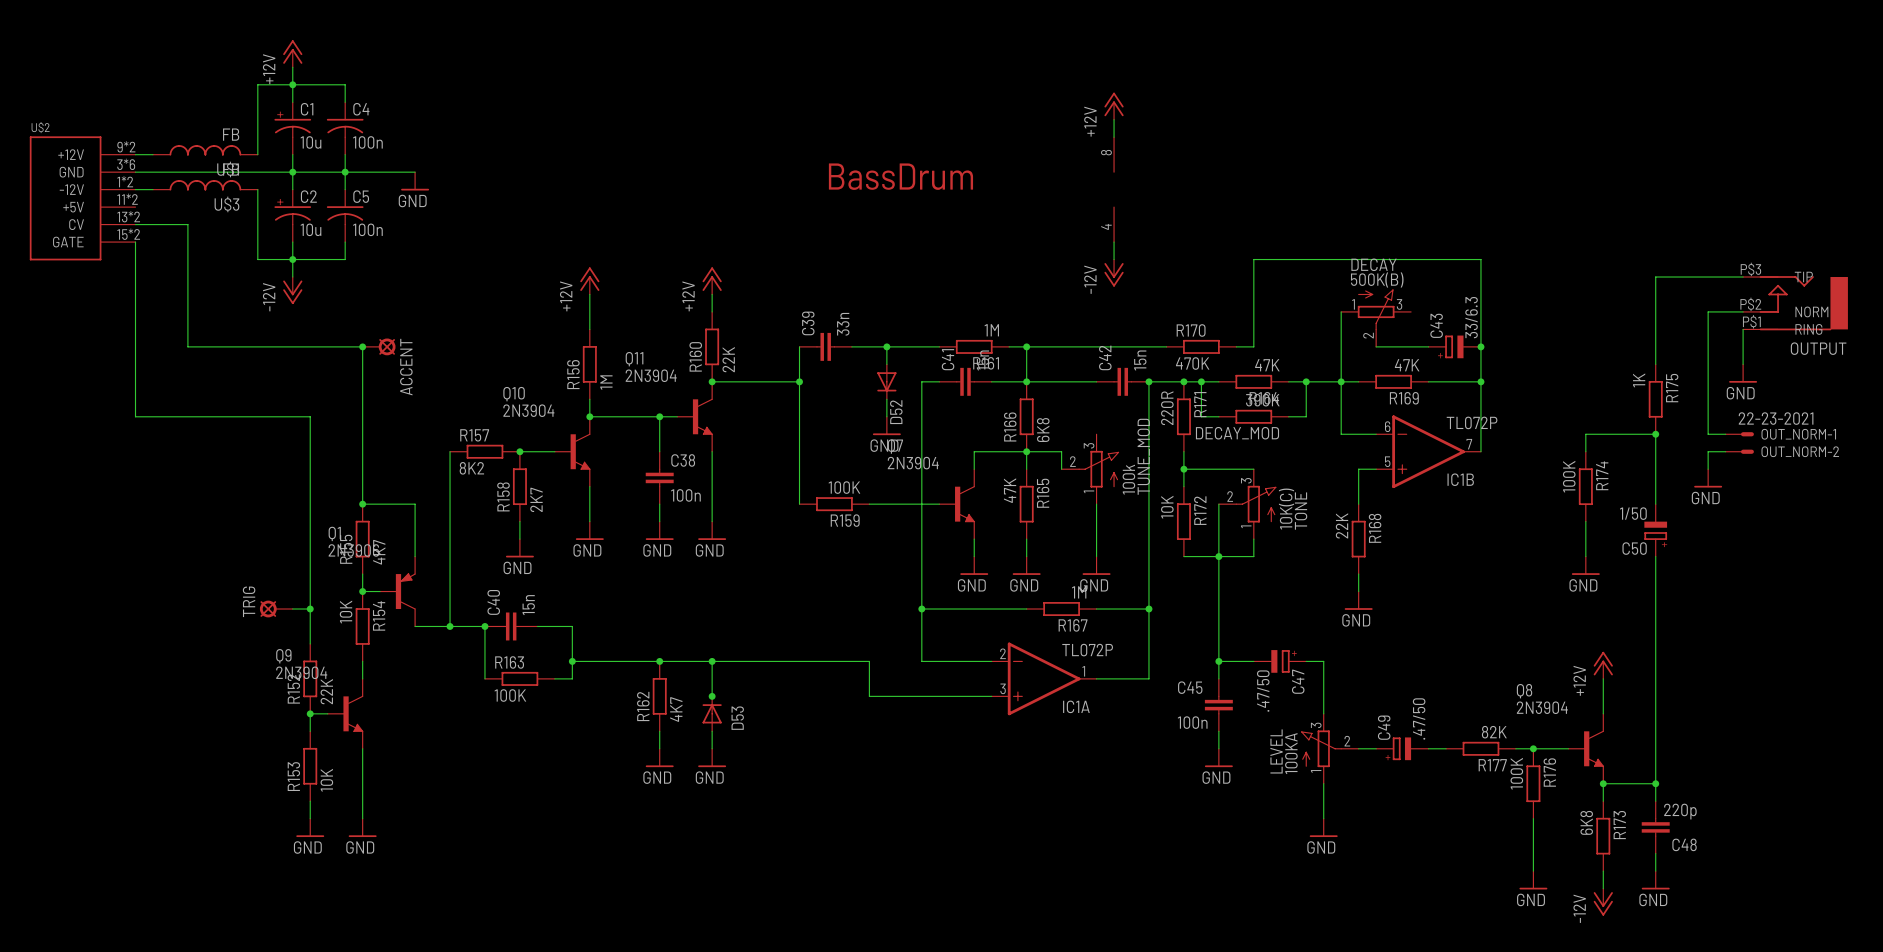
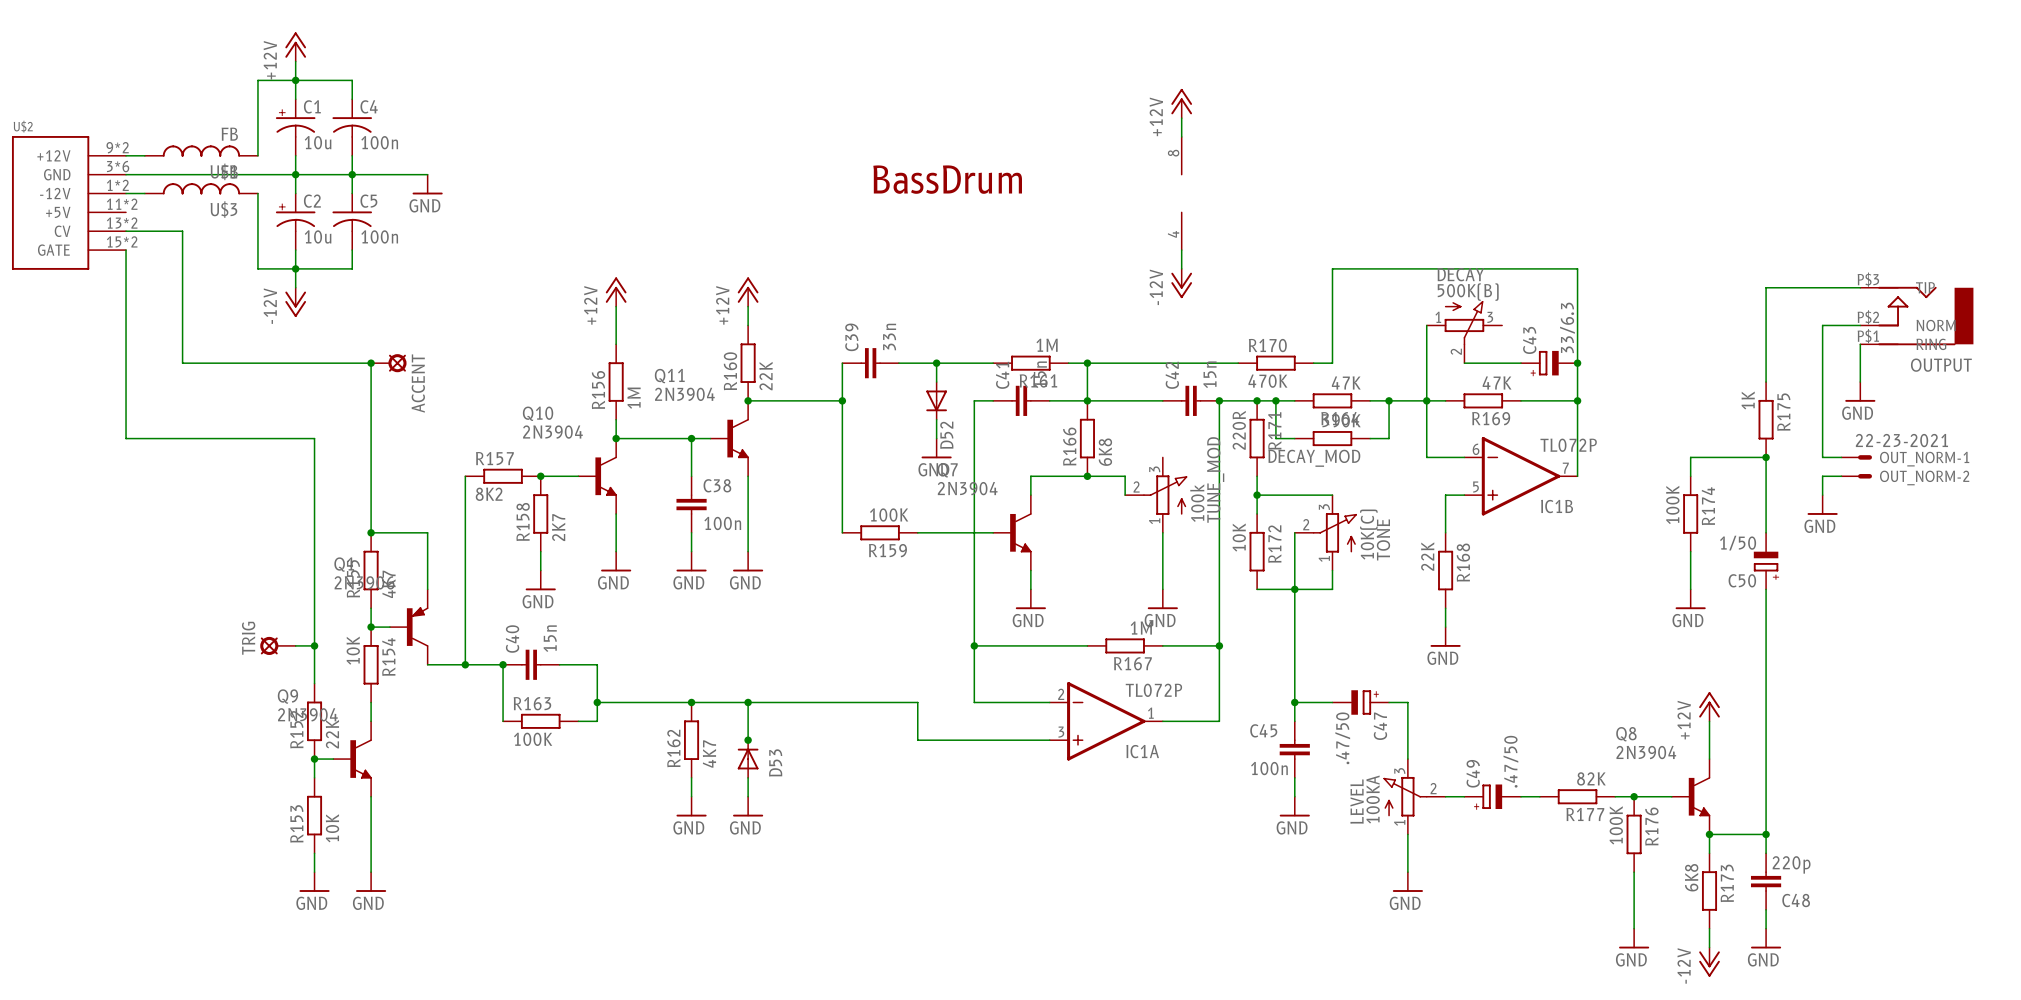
wire: (1026, 451) (1026, 469) -> none
R165: 47K (1026, 504) -> none
wire: (1026, 539) (1026, 556) -> none
power symbol: GND (1026, 565) -> none

